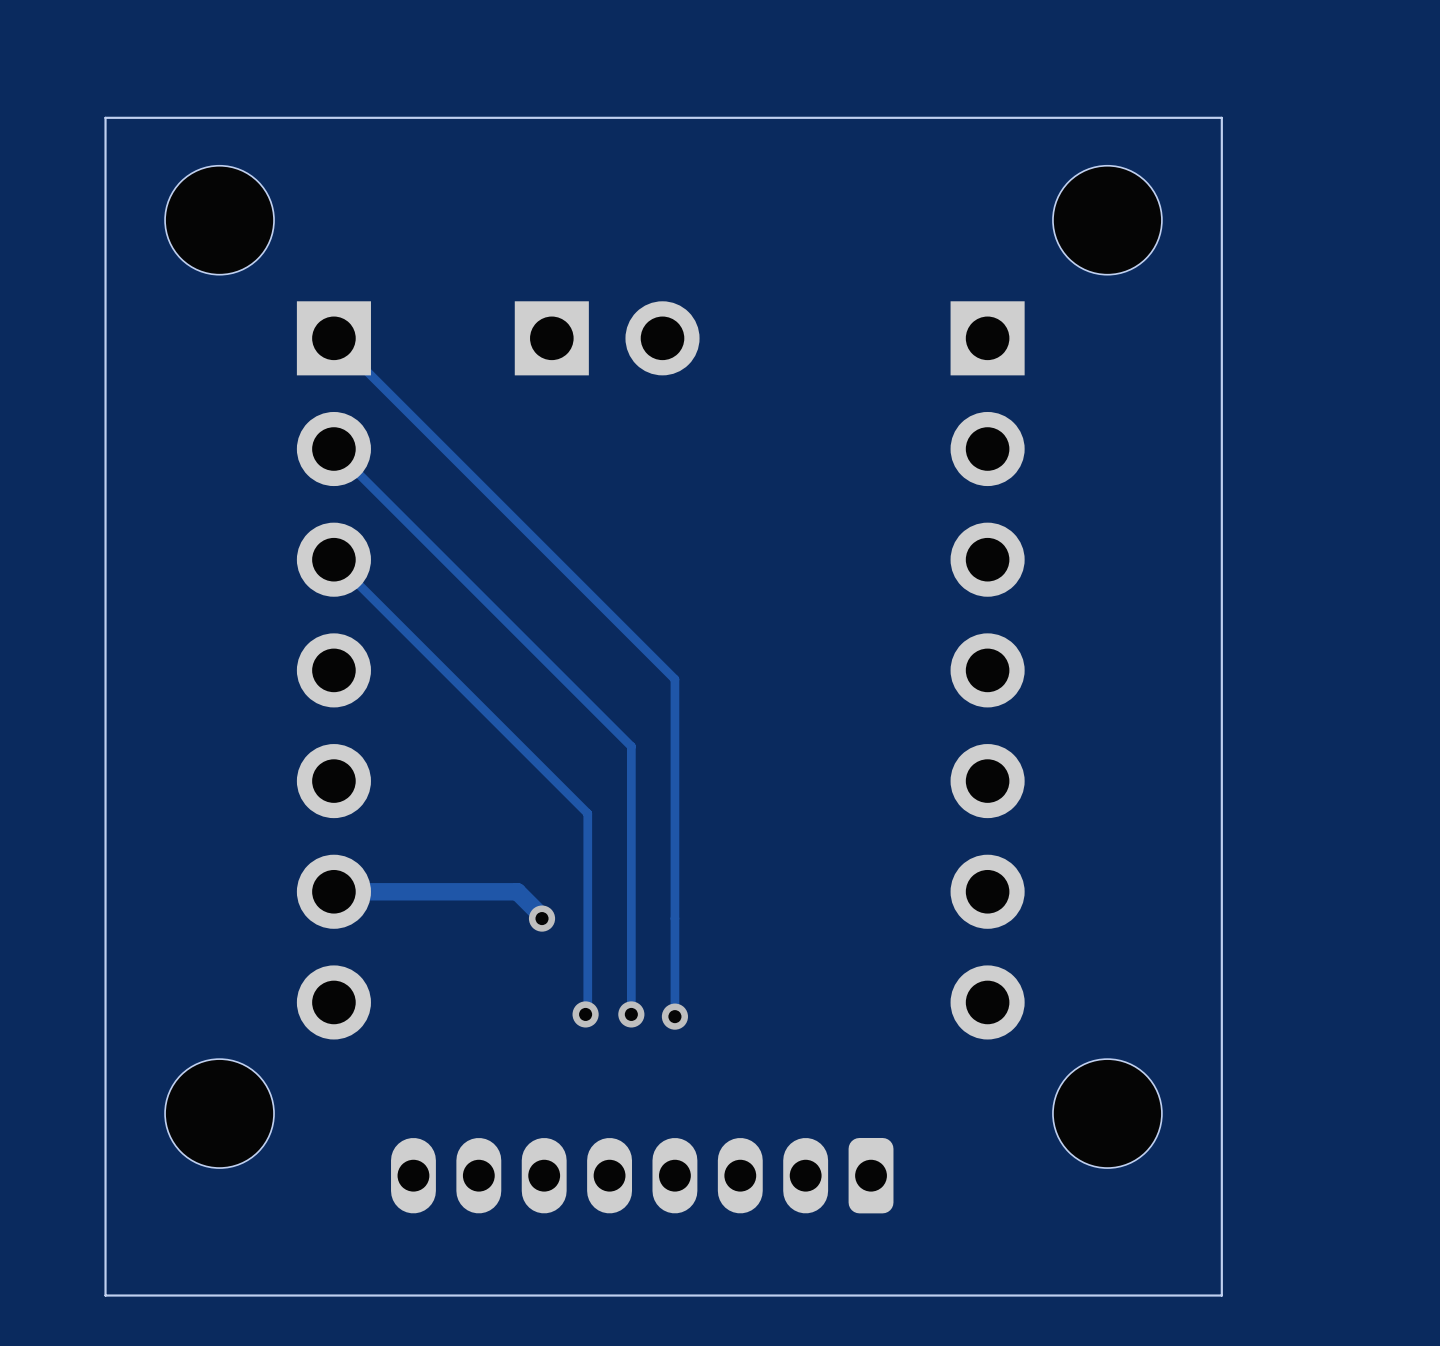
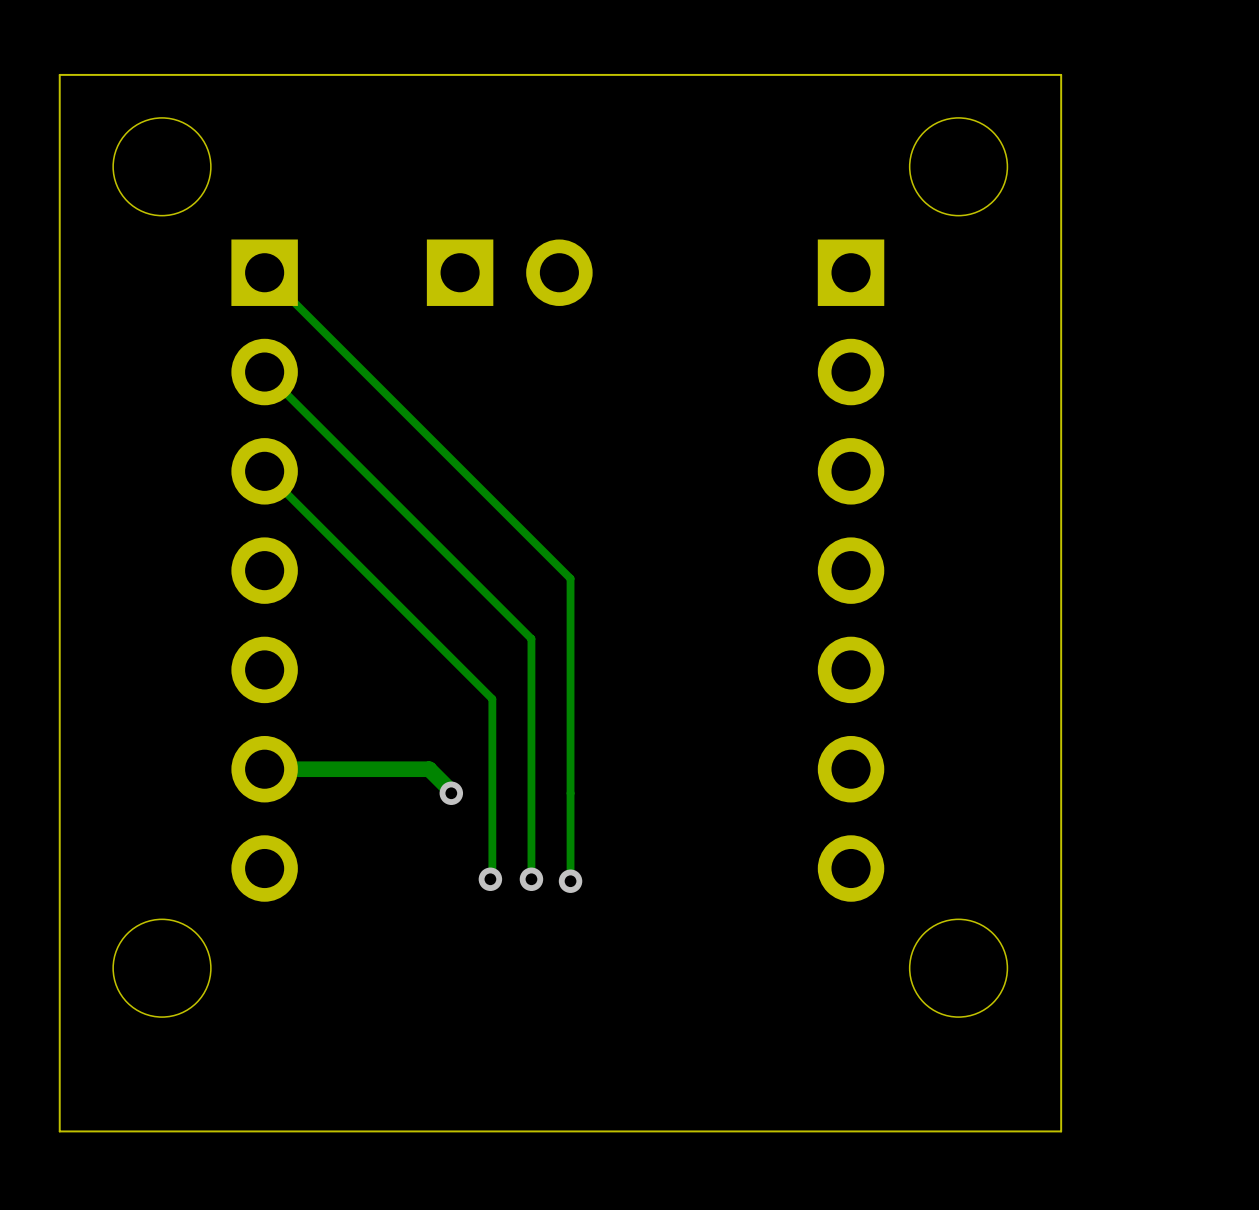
part: (642, 1175) -> none

